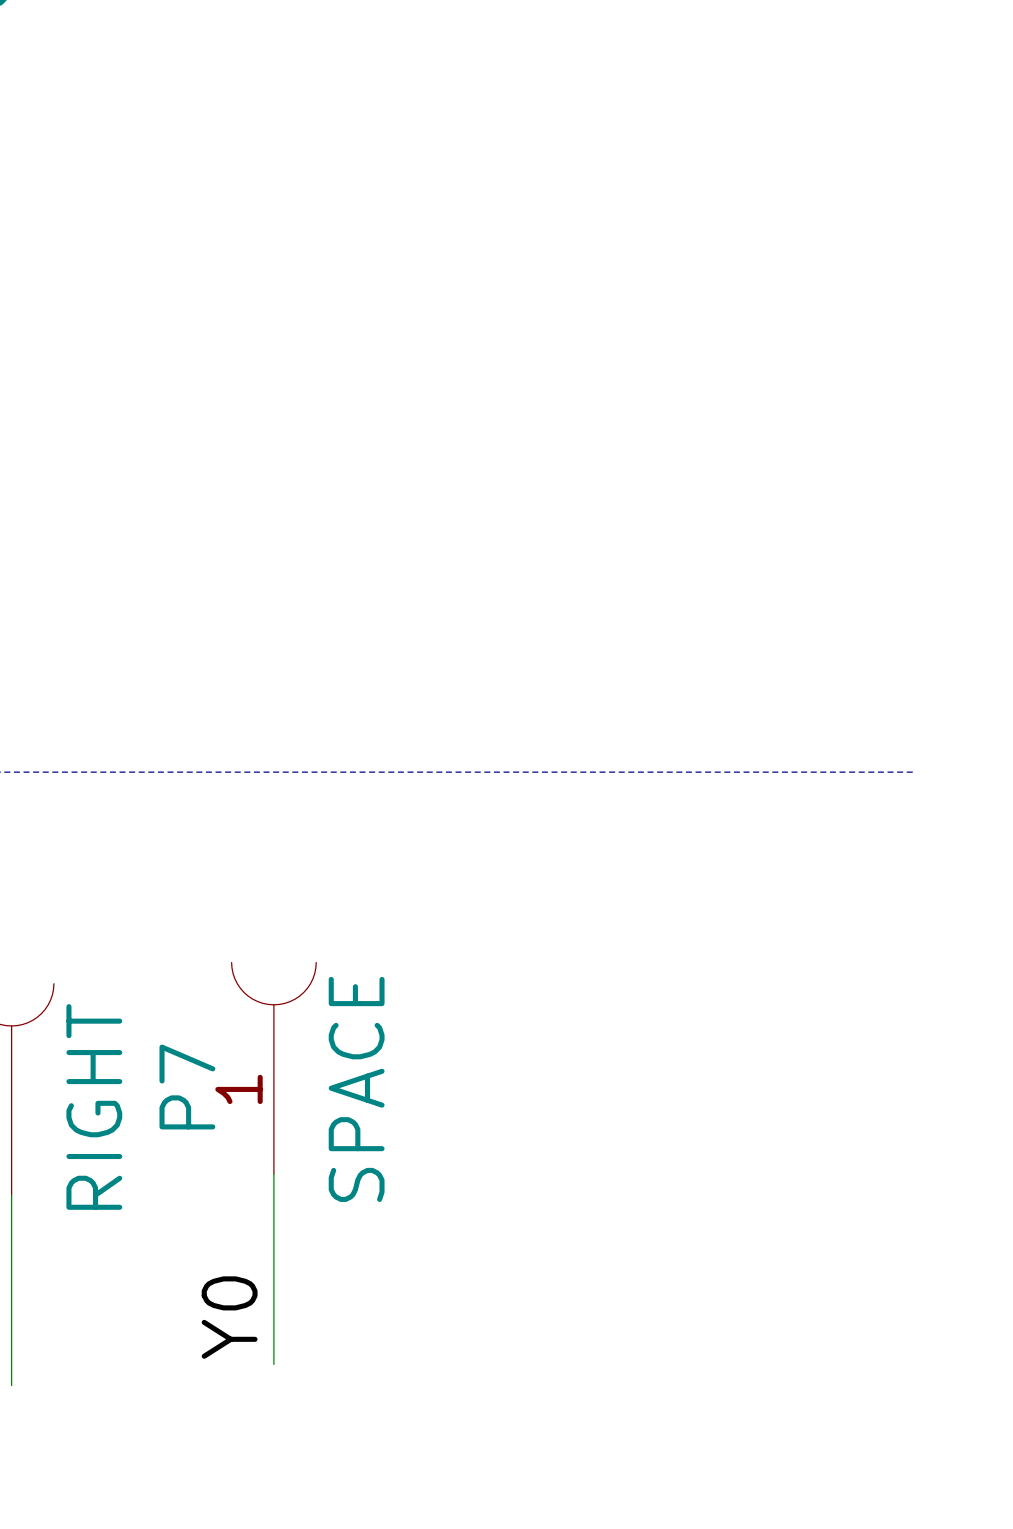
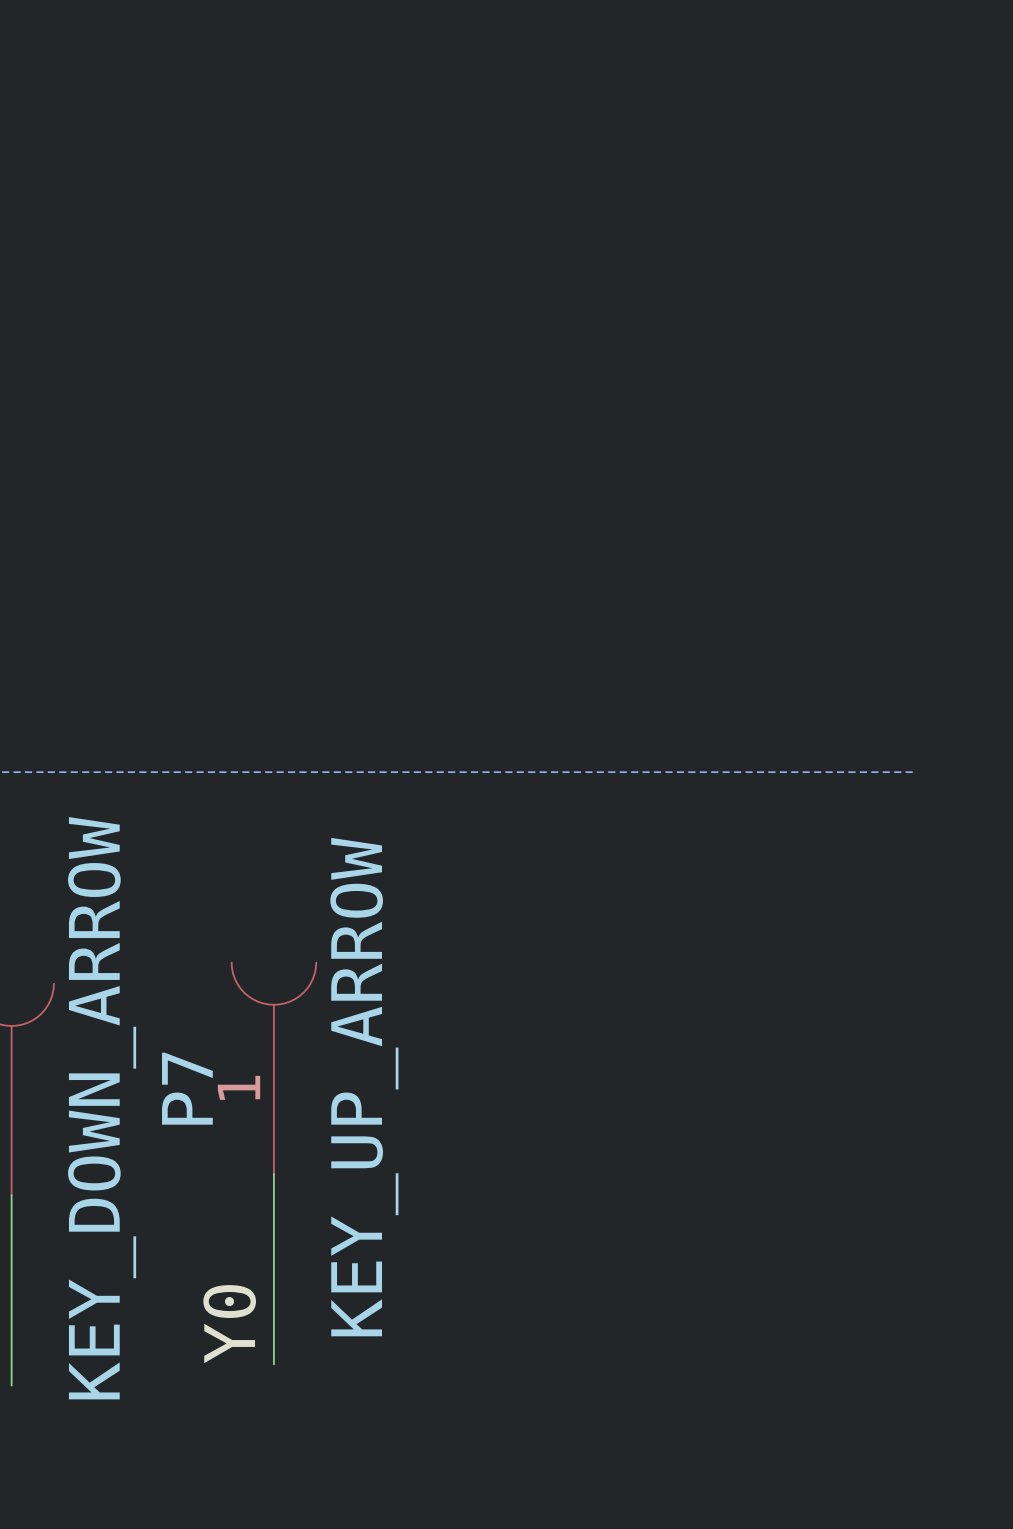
P7 value: SPACE (356, 1089) -> KEY_UP_ARROW (364, 1087)
part value: RIGHT (94, 1106) -> KEY_DOWN_ARROW (102, 1108)

